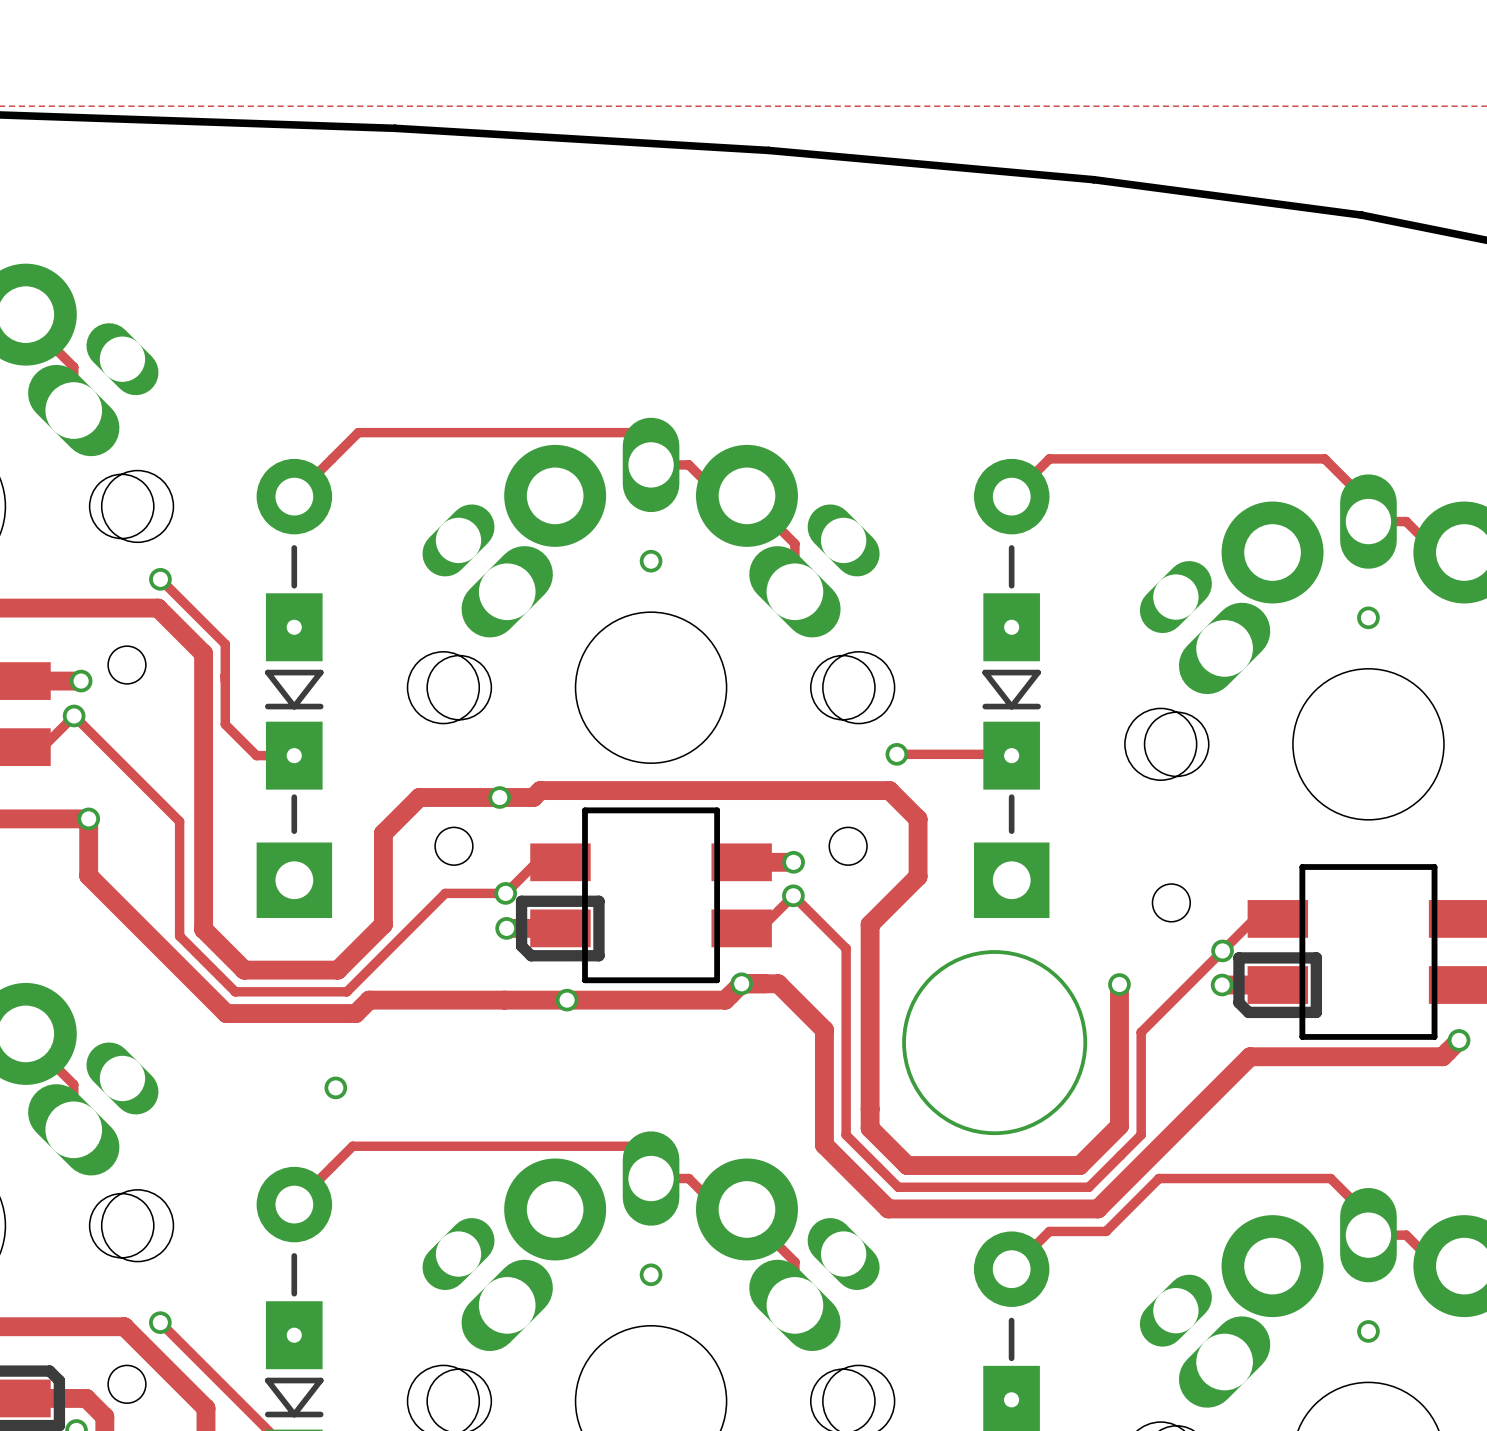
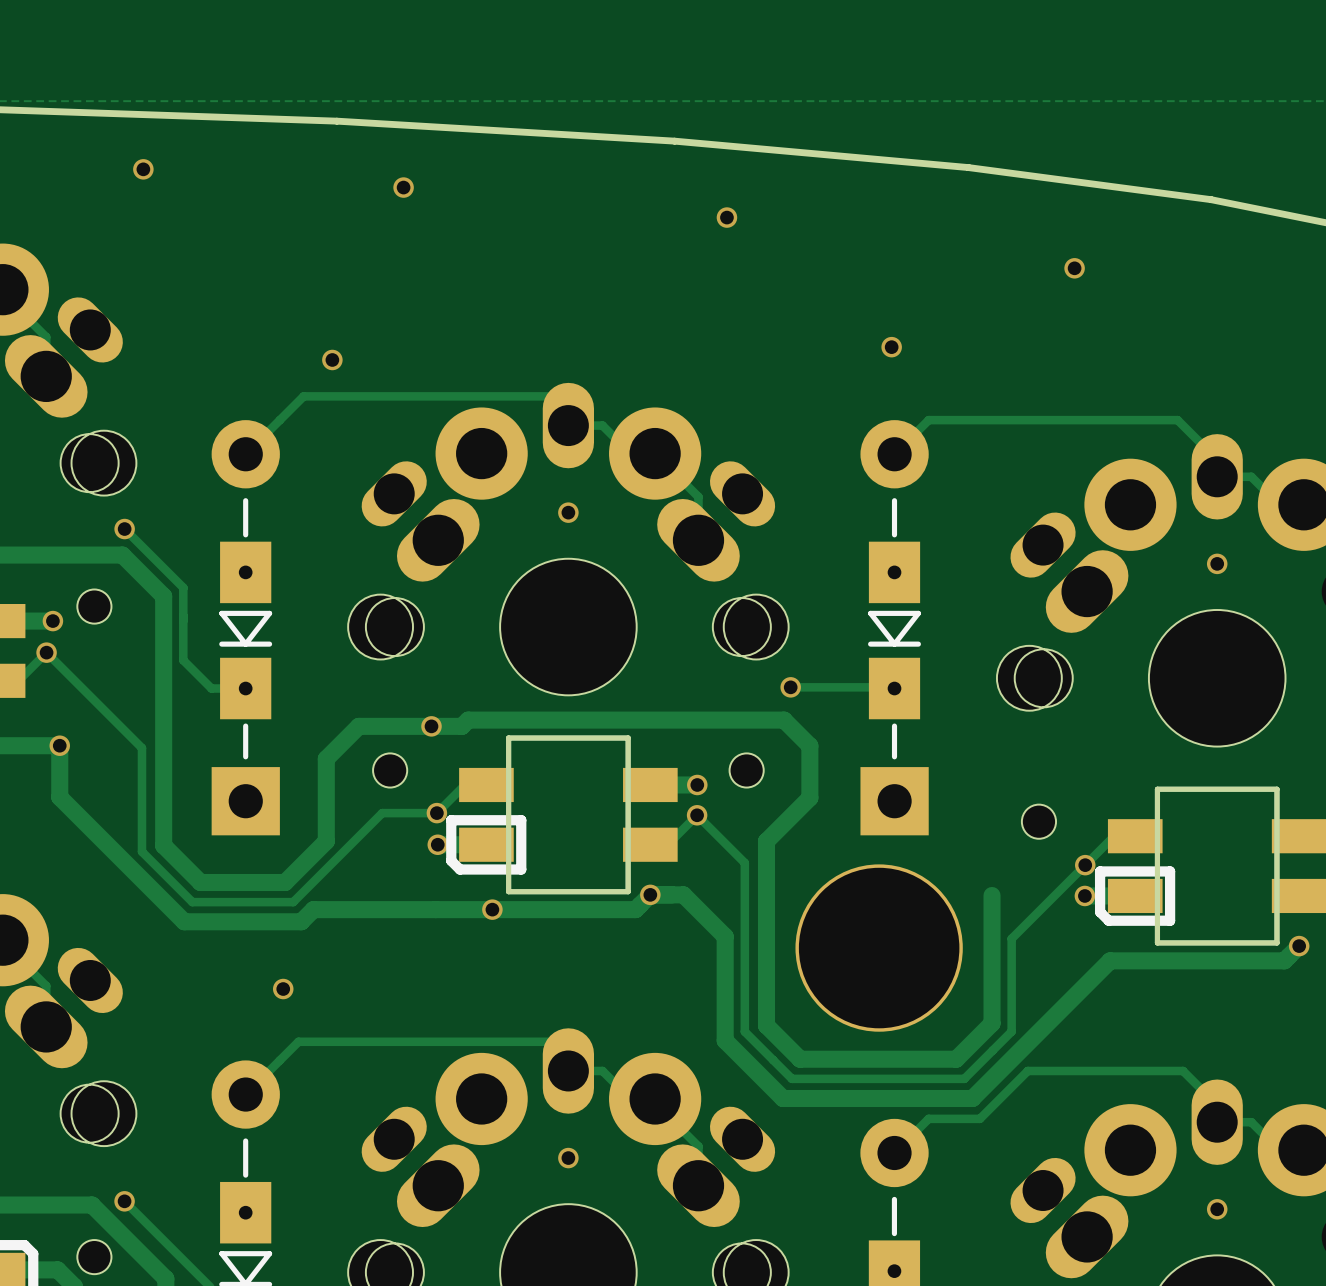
via: none -> (143, 169)
via: none -> (403, 187)
via: none -> (726, 217)
via: none -> (1074, 268)
via: none -> (891, 347)
via: none -> (332, 359)
via: (1119, 984) -> none

